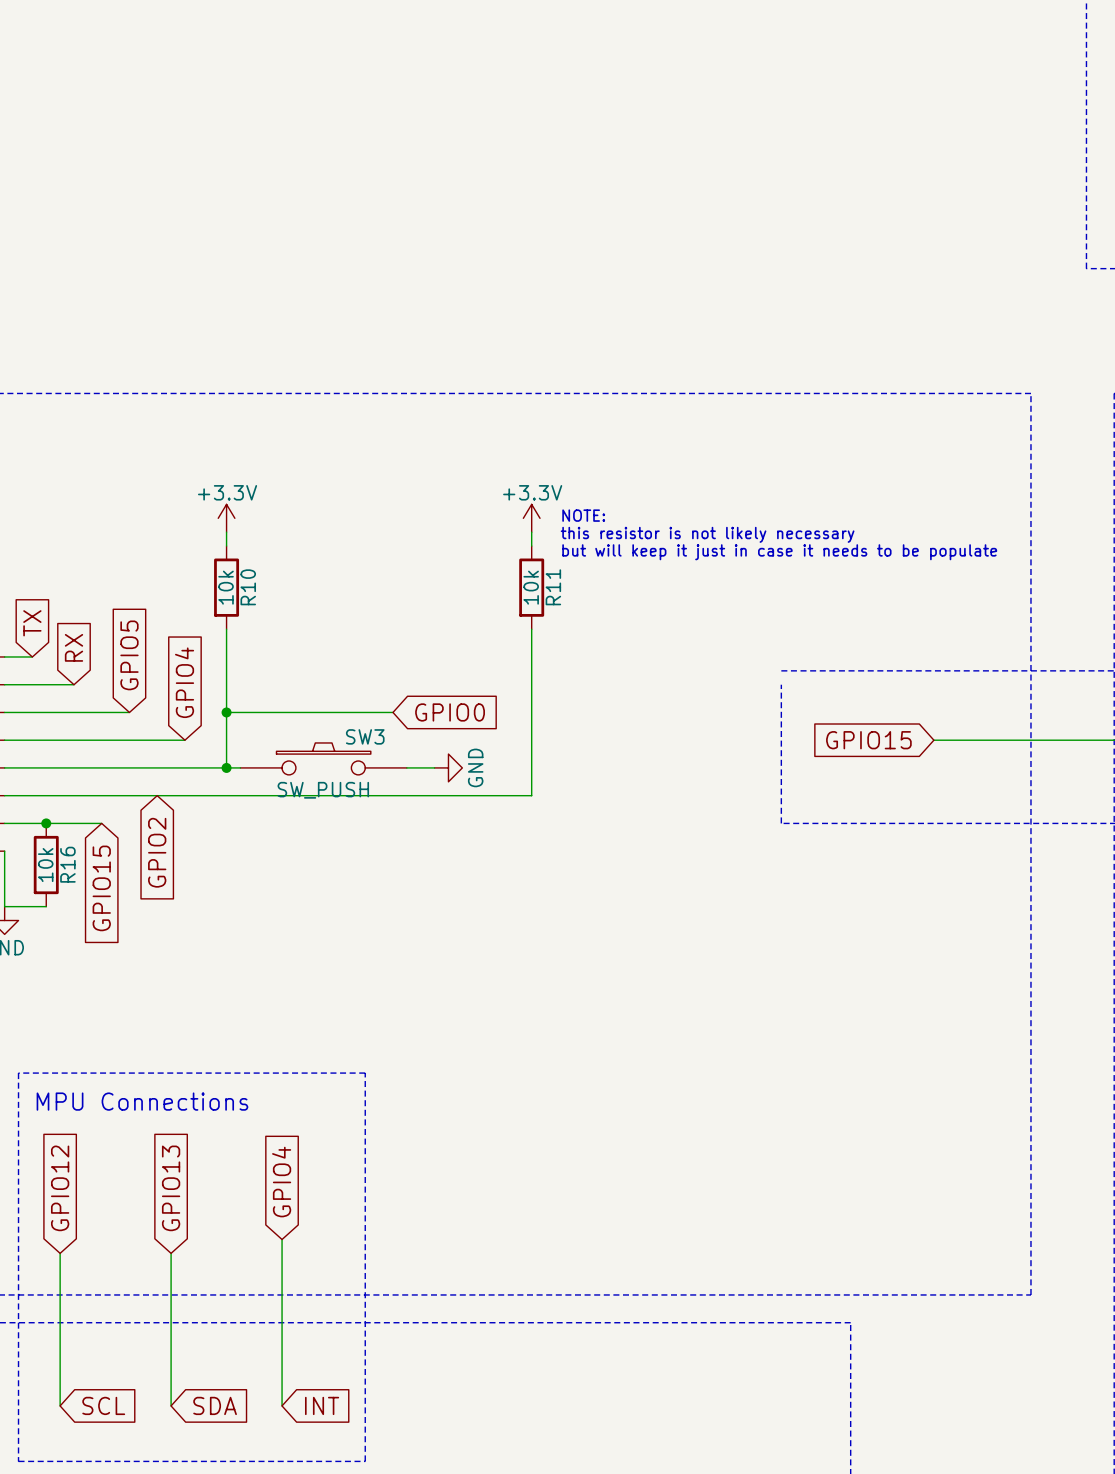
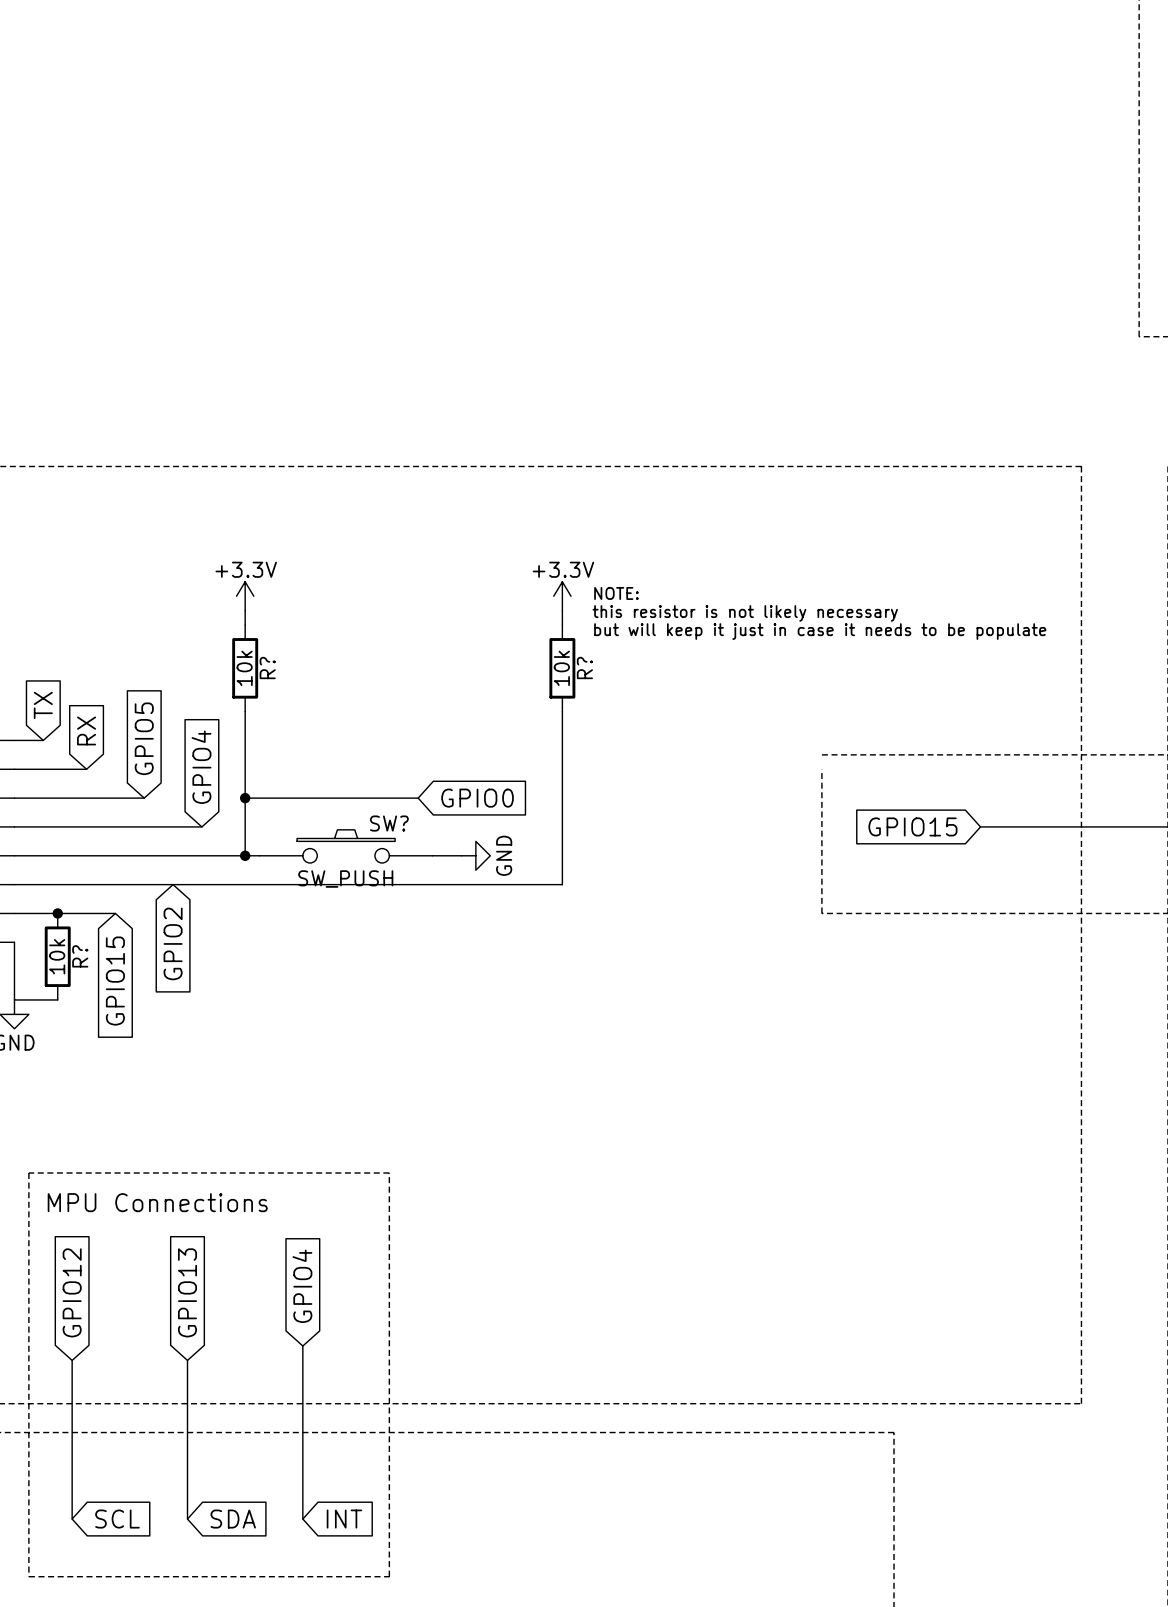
R10 name: R10 (248, 587) -> R? (267, 668)
R11 name: R11 (553, 587) -> R? (584, 668)
SW3 name: SW3 (365, 736) -> SW? (389, 823)
R16 name: R16 (67, 864) -> R? (80, 956)

